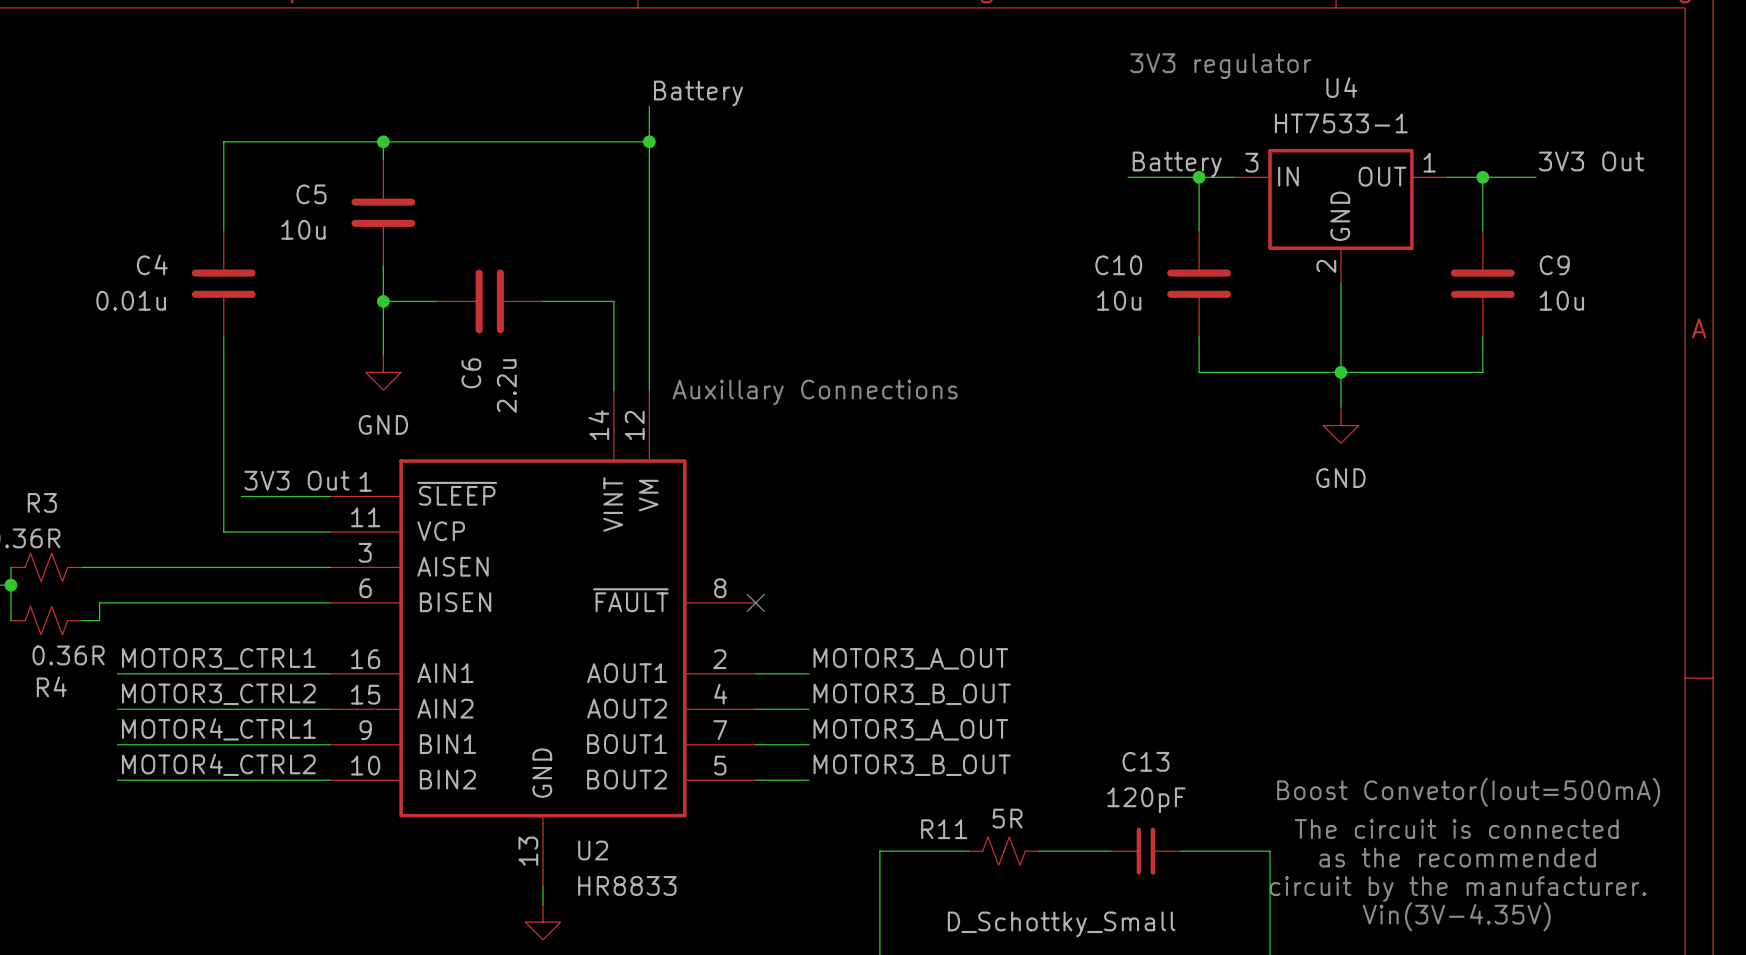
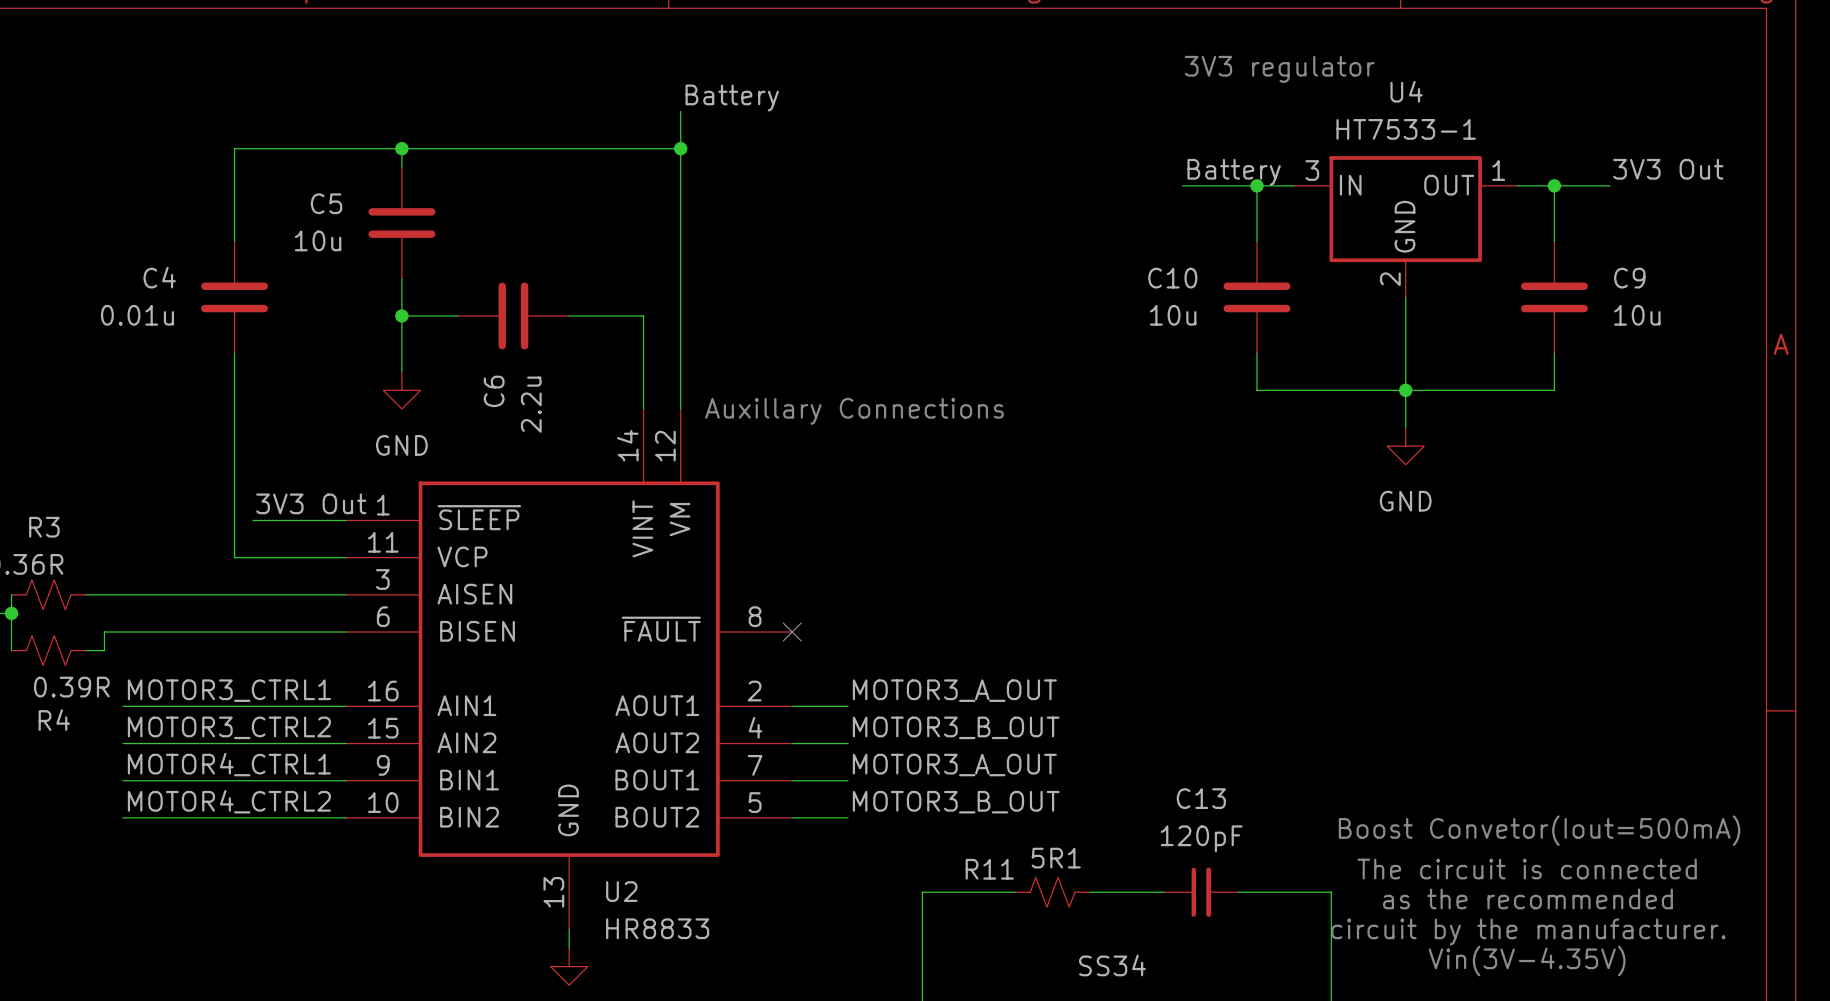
R4 value: 0.36R (68, 655) -> 0.39R (71, 687)
R11 value: 5R (1007, 818) -> 5R1 (1056, 858)
part value: D_Schottky_Small (1061, 924) -> SS34 (1112, 965)

